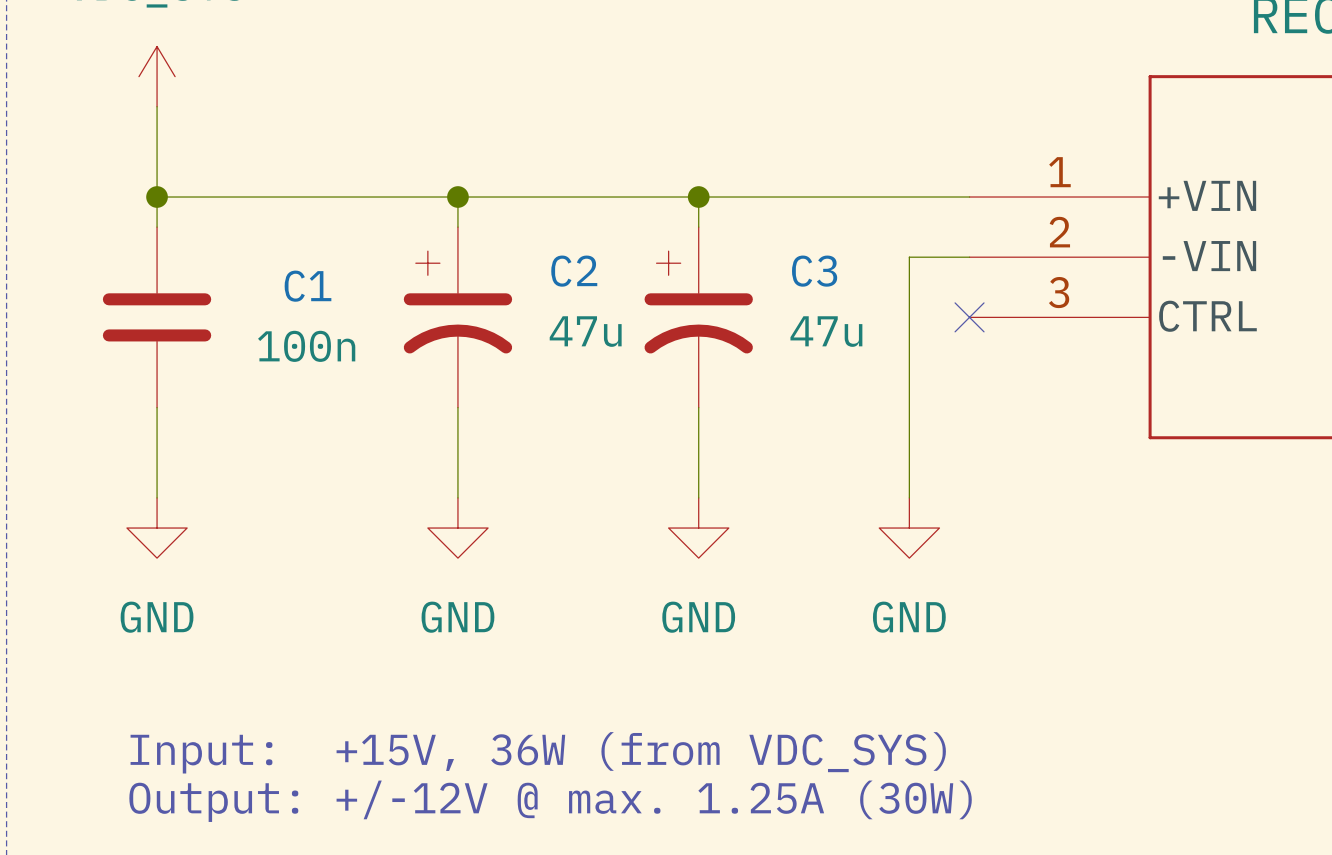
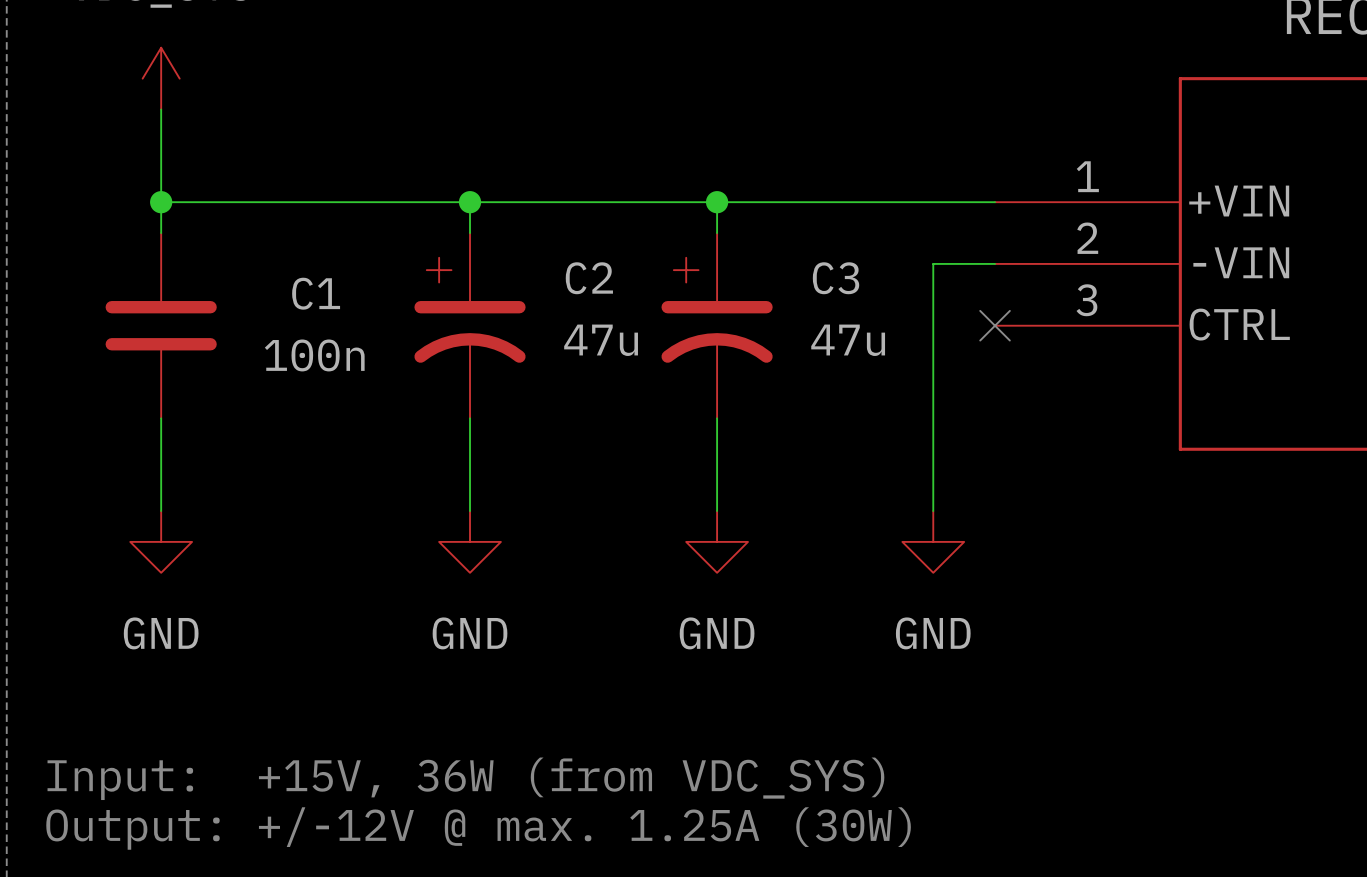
text position: Input: +15V, 36W (from VDC_SYS) (538, 752) -> Input: +15V, 36W (from VDC_SYS) (465, 778)
text position: Output: +/-12V @ max. 1.25A (30W) (550, 801) -> Output: +/-12V @ max. 1.25A (30W) (478, 828)

